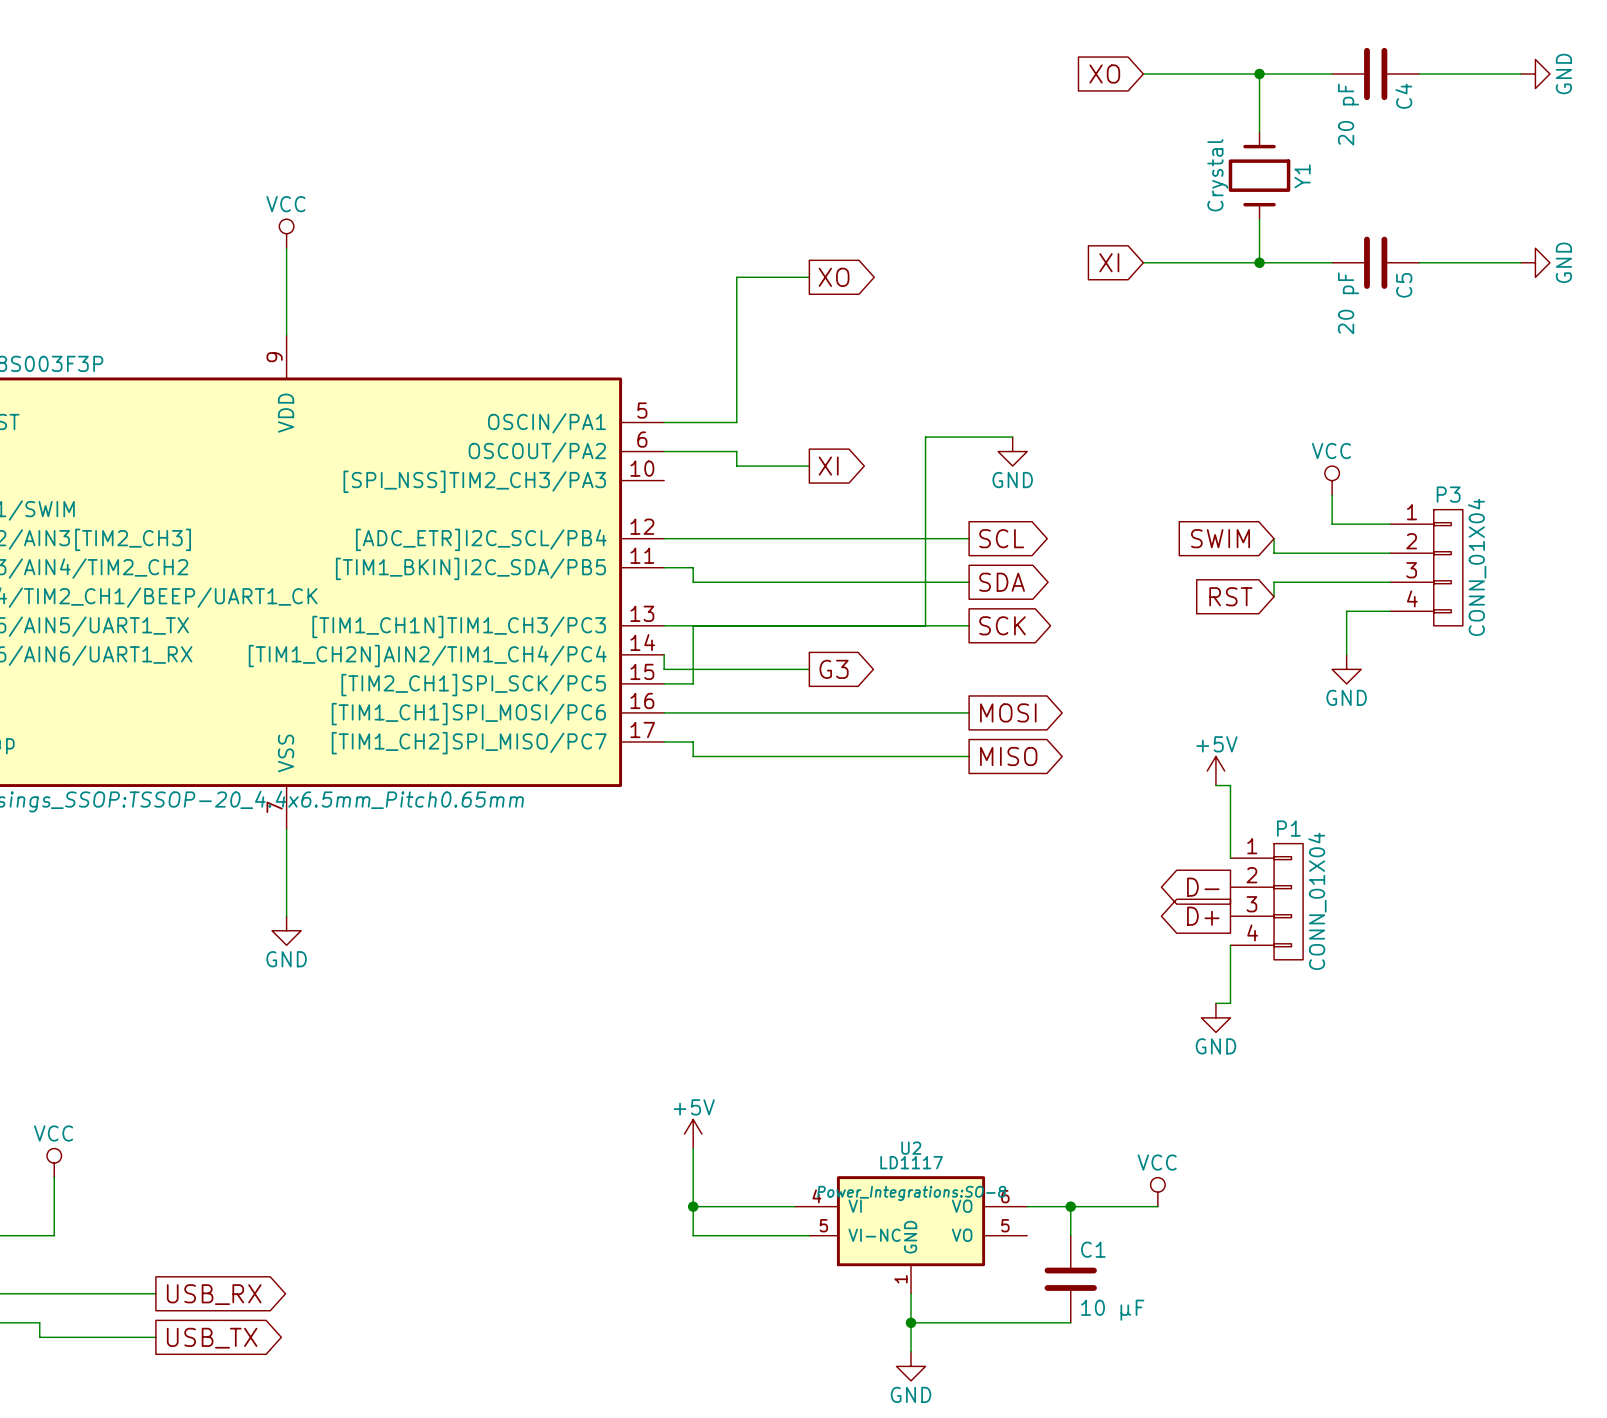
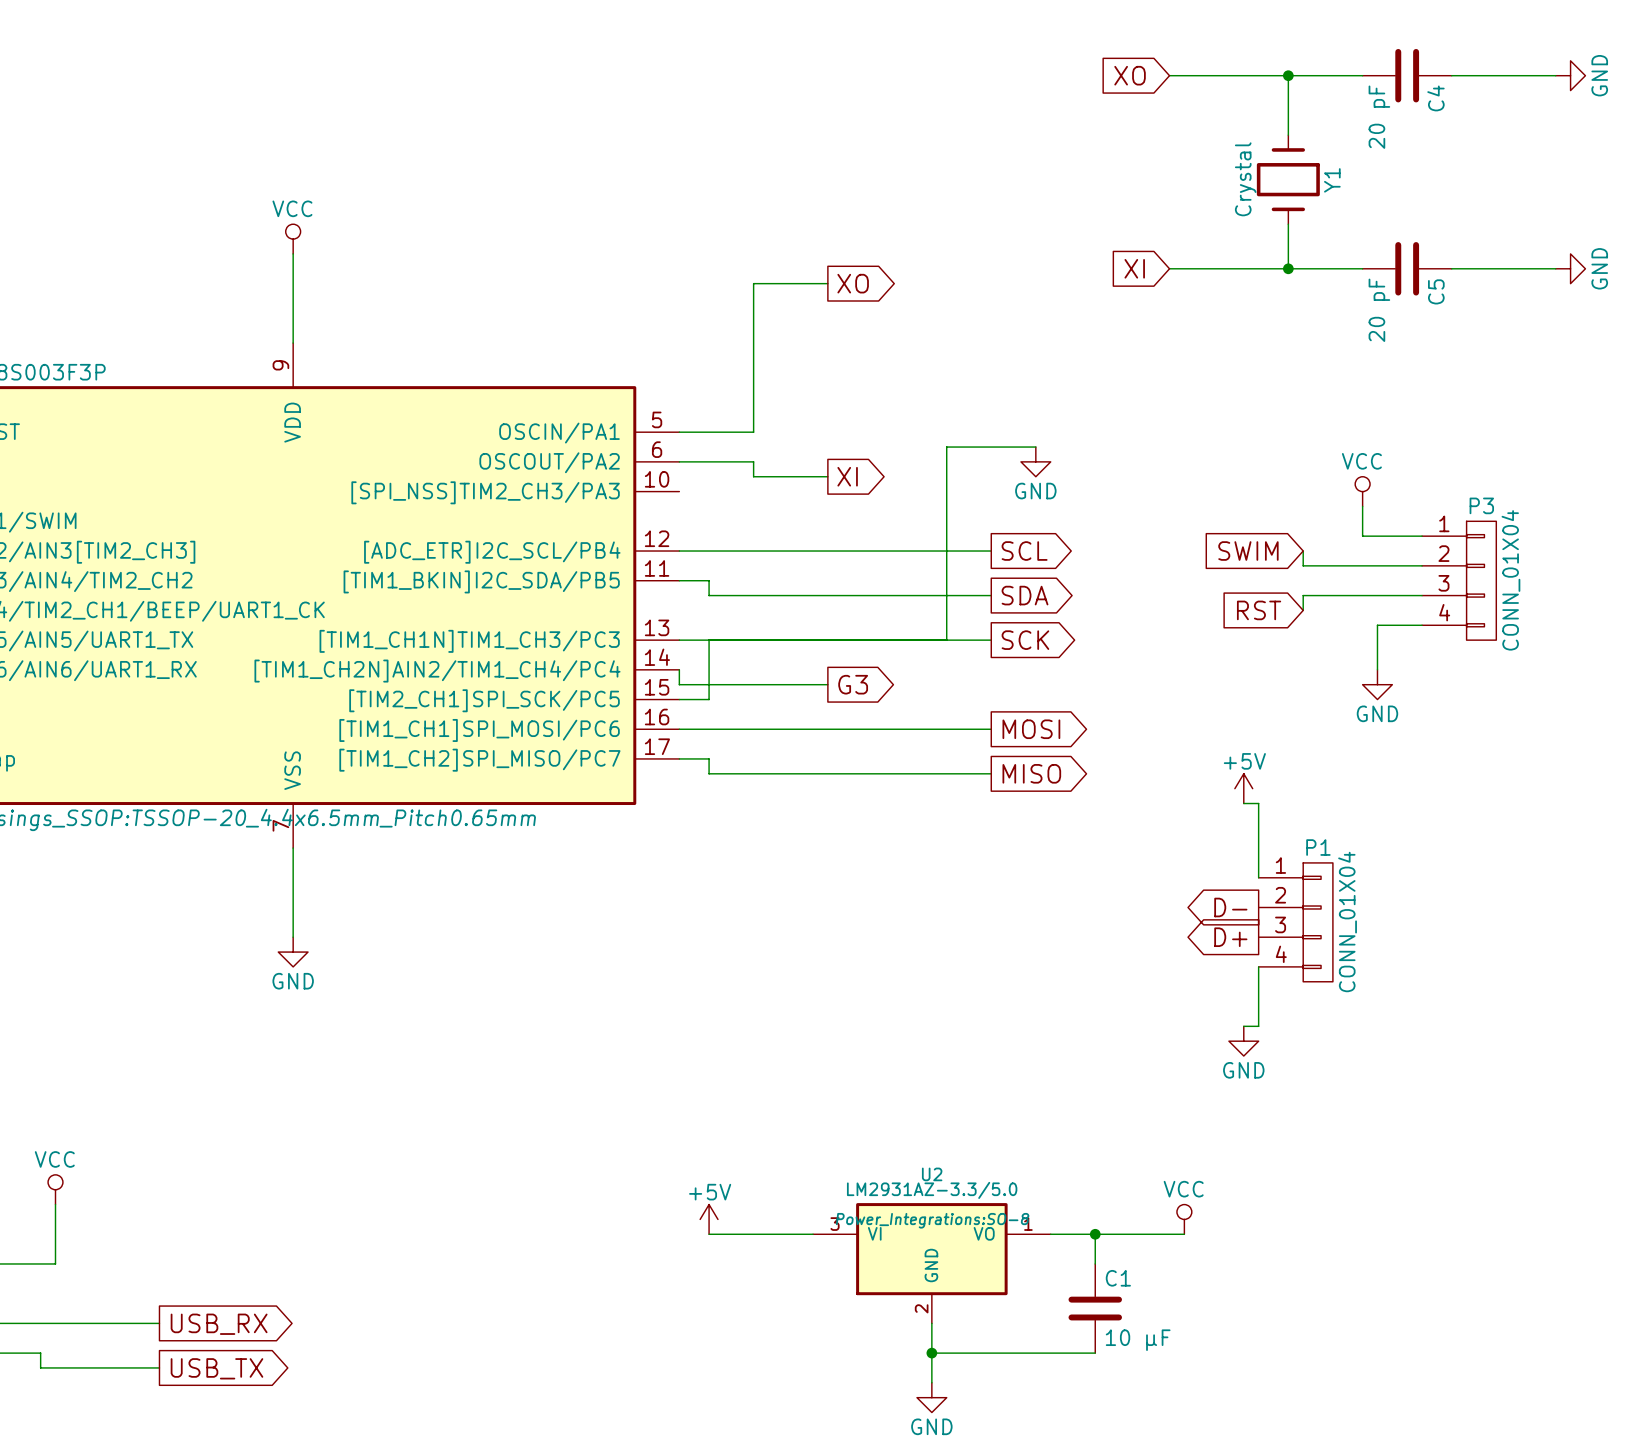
power symbol position: +5V (693, 1134) -> +5V (709, 1219)
wire: (693, 1148) (693, 1235) (809, 1235) -> none
U2 value: LD1117 (911, 1162) -> LM2931AZ-3.3/5.0 (932, 1190)
U2 symbol: [794, 1176, 1028, 1294] -> [813, 1203, 1051, 1324]
junction: (693, 1206) -> none

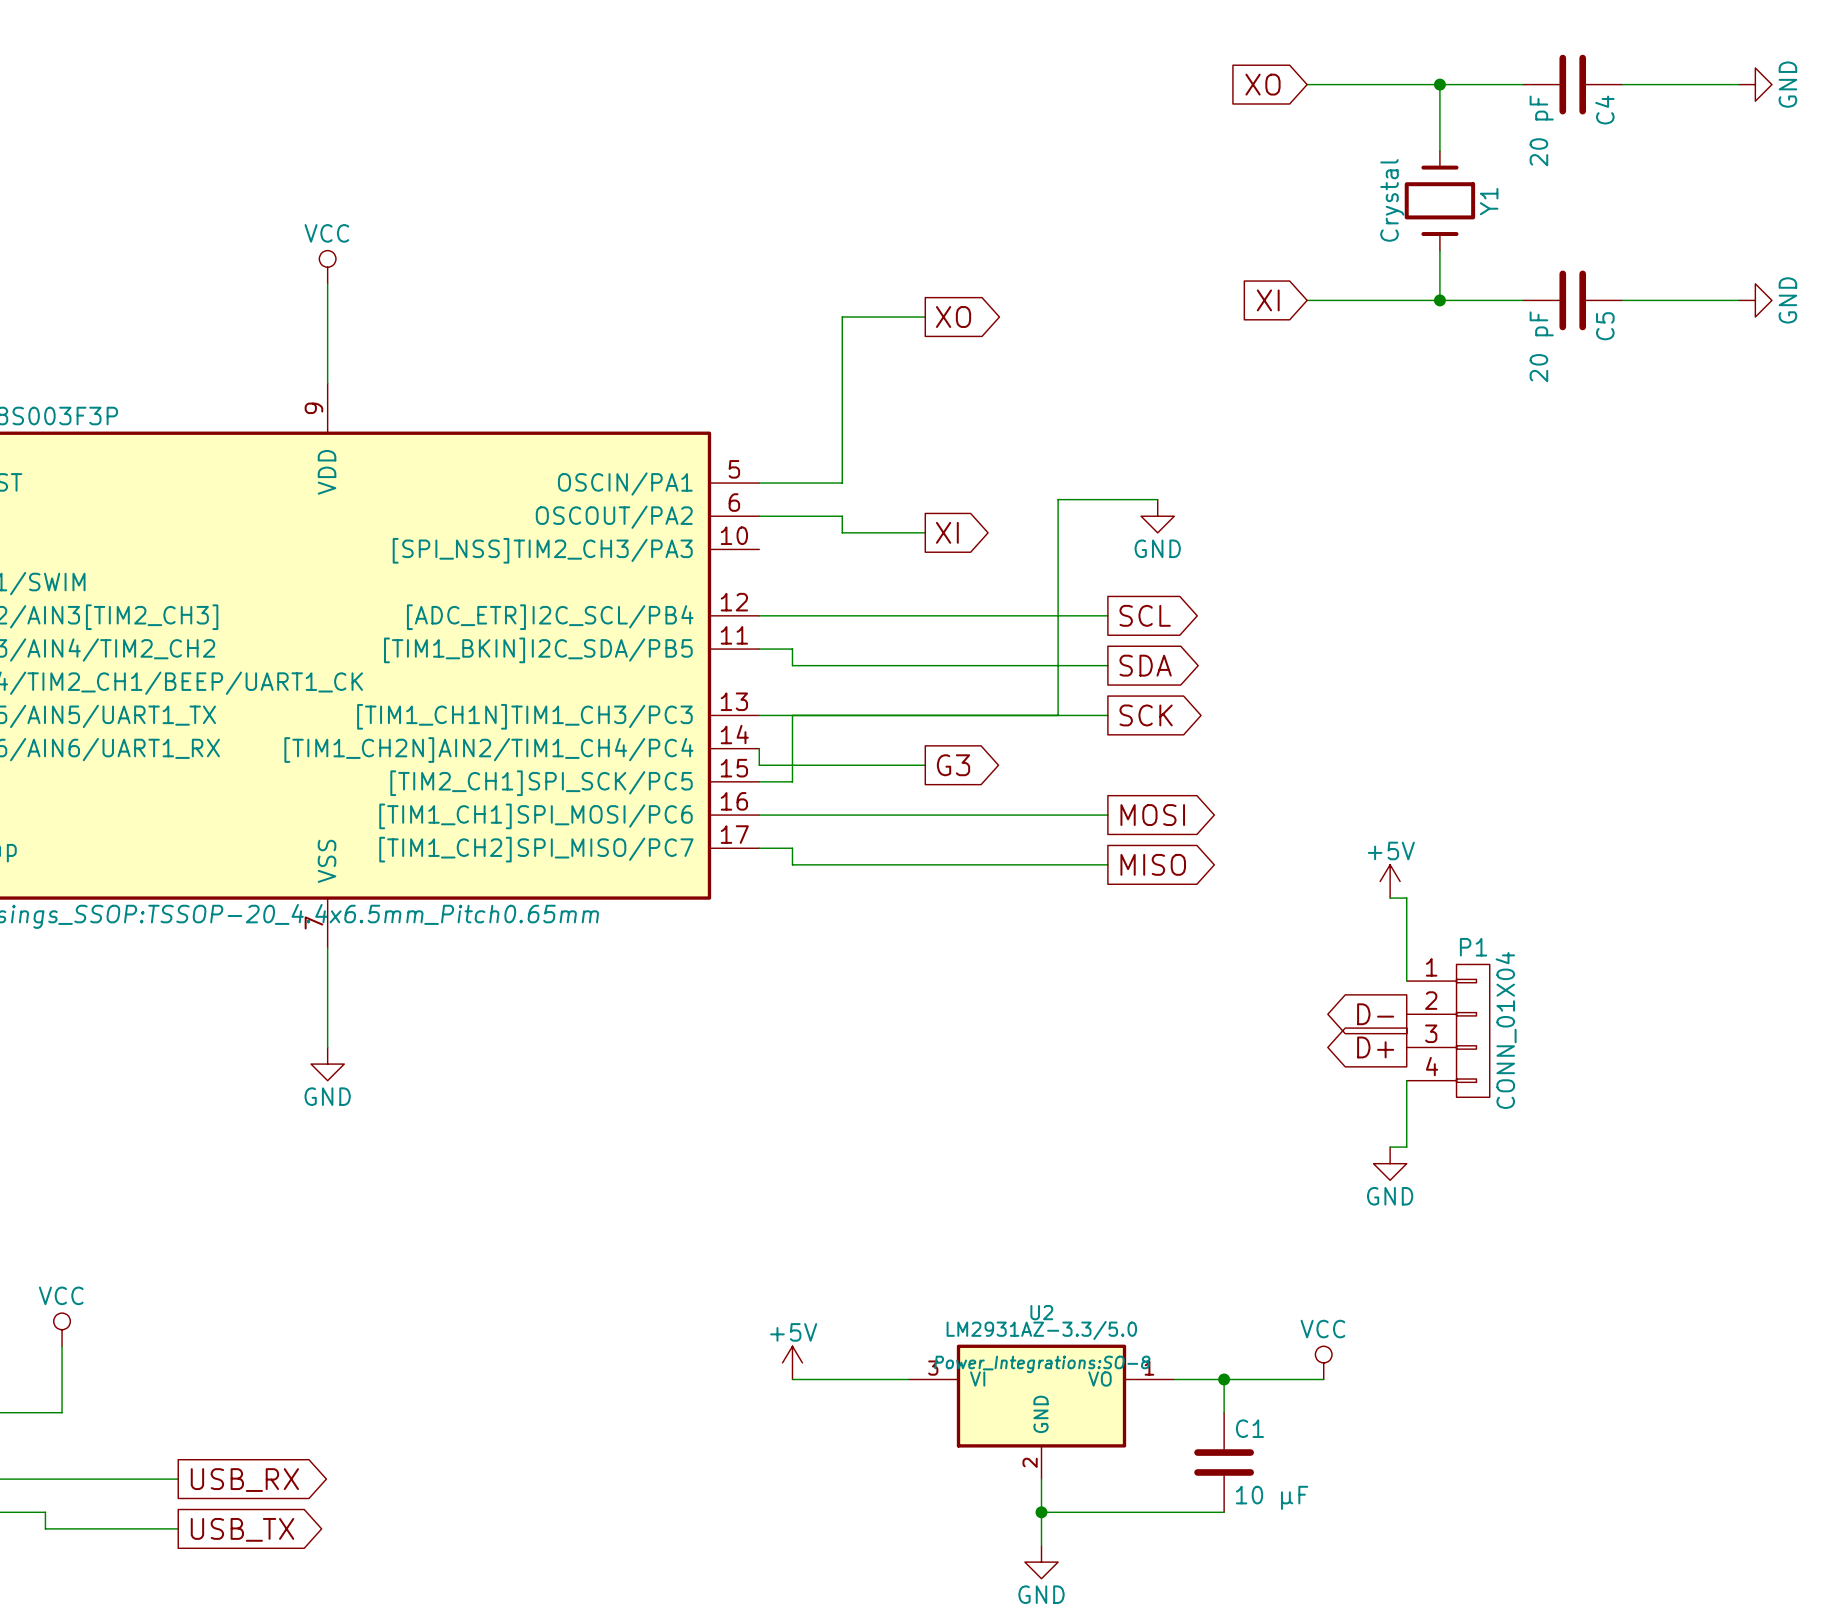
power symbol: VCC (1362, 491) -> none
wire: (1362, 506) (1362, 536) (1422, 536) -> none
global label: SWIM (1248, 551) -> none
wire: (1303, 551) (1303, 565) (1422, 565) -> none
P3: CONN_01X04 (1459, 580) -> none
wire: (1422, 595) (1303, 595) (1303, 610) -> none
global label: RST (1259, 610) -> none
wire: (1422, 625) (1377, 625) (1377, 669) -> none
power symbol: GND (1377, 684) -> none

